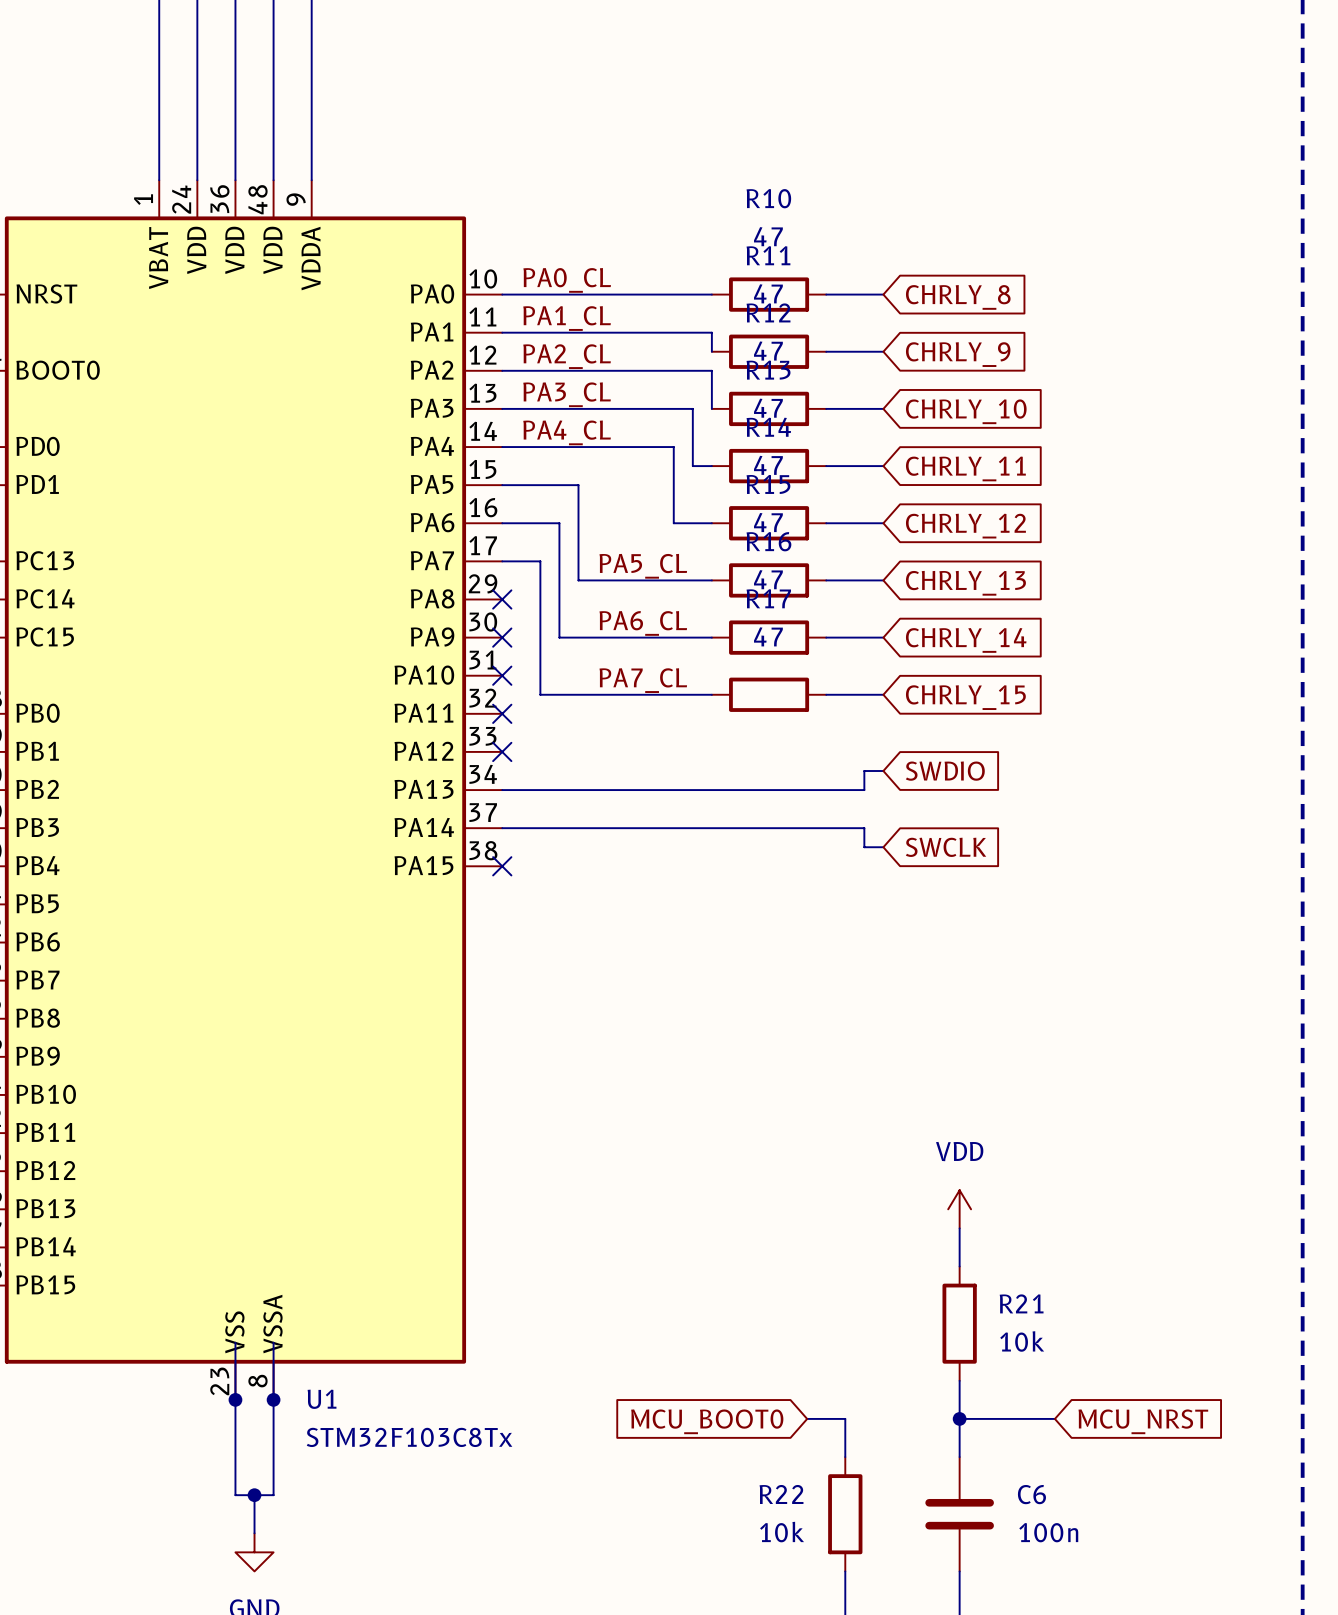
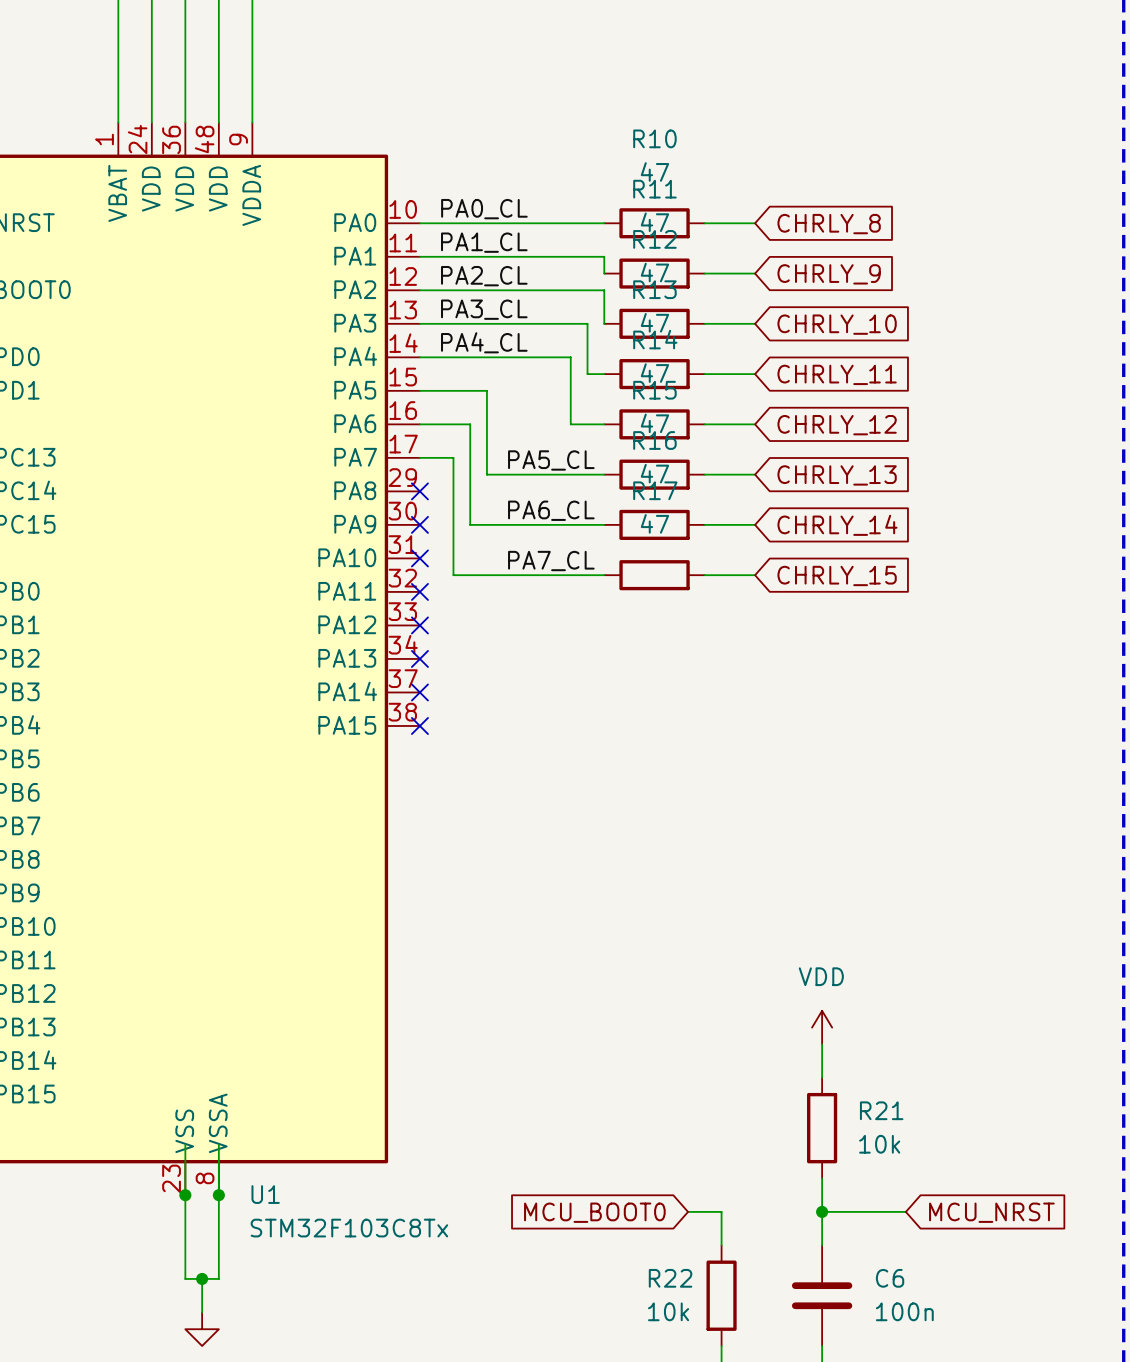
wire: (883, 771) (864, 771) (864, 790) (502, 790) -> none
global label: SWDIO (945, 771) -> none
no-connect mark: none -> (419, 658)
wire: (502, 828) (864, 828) (864, 847) (883, 847) -> none
no-connect mark: none -> (419, 692)
global label: SWCLK (946, 847) -> none

